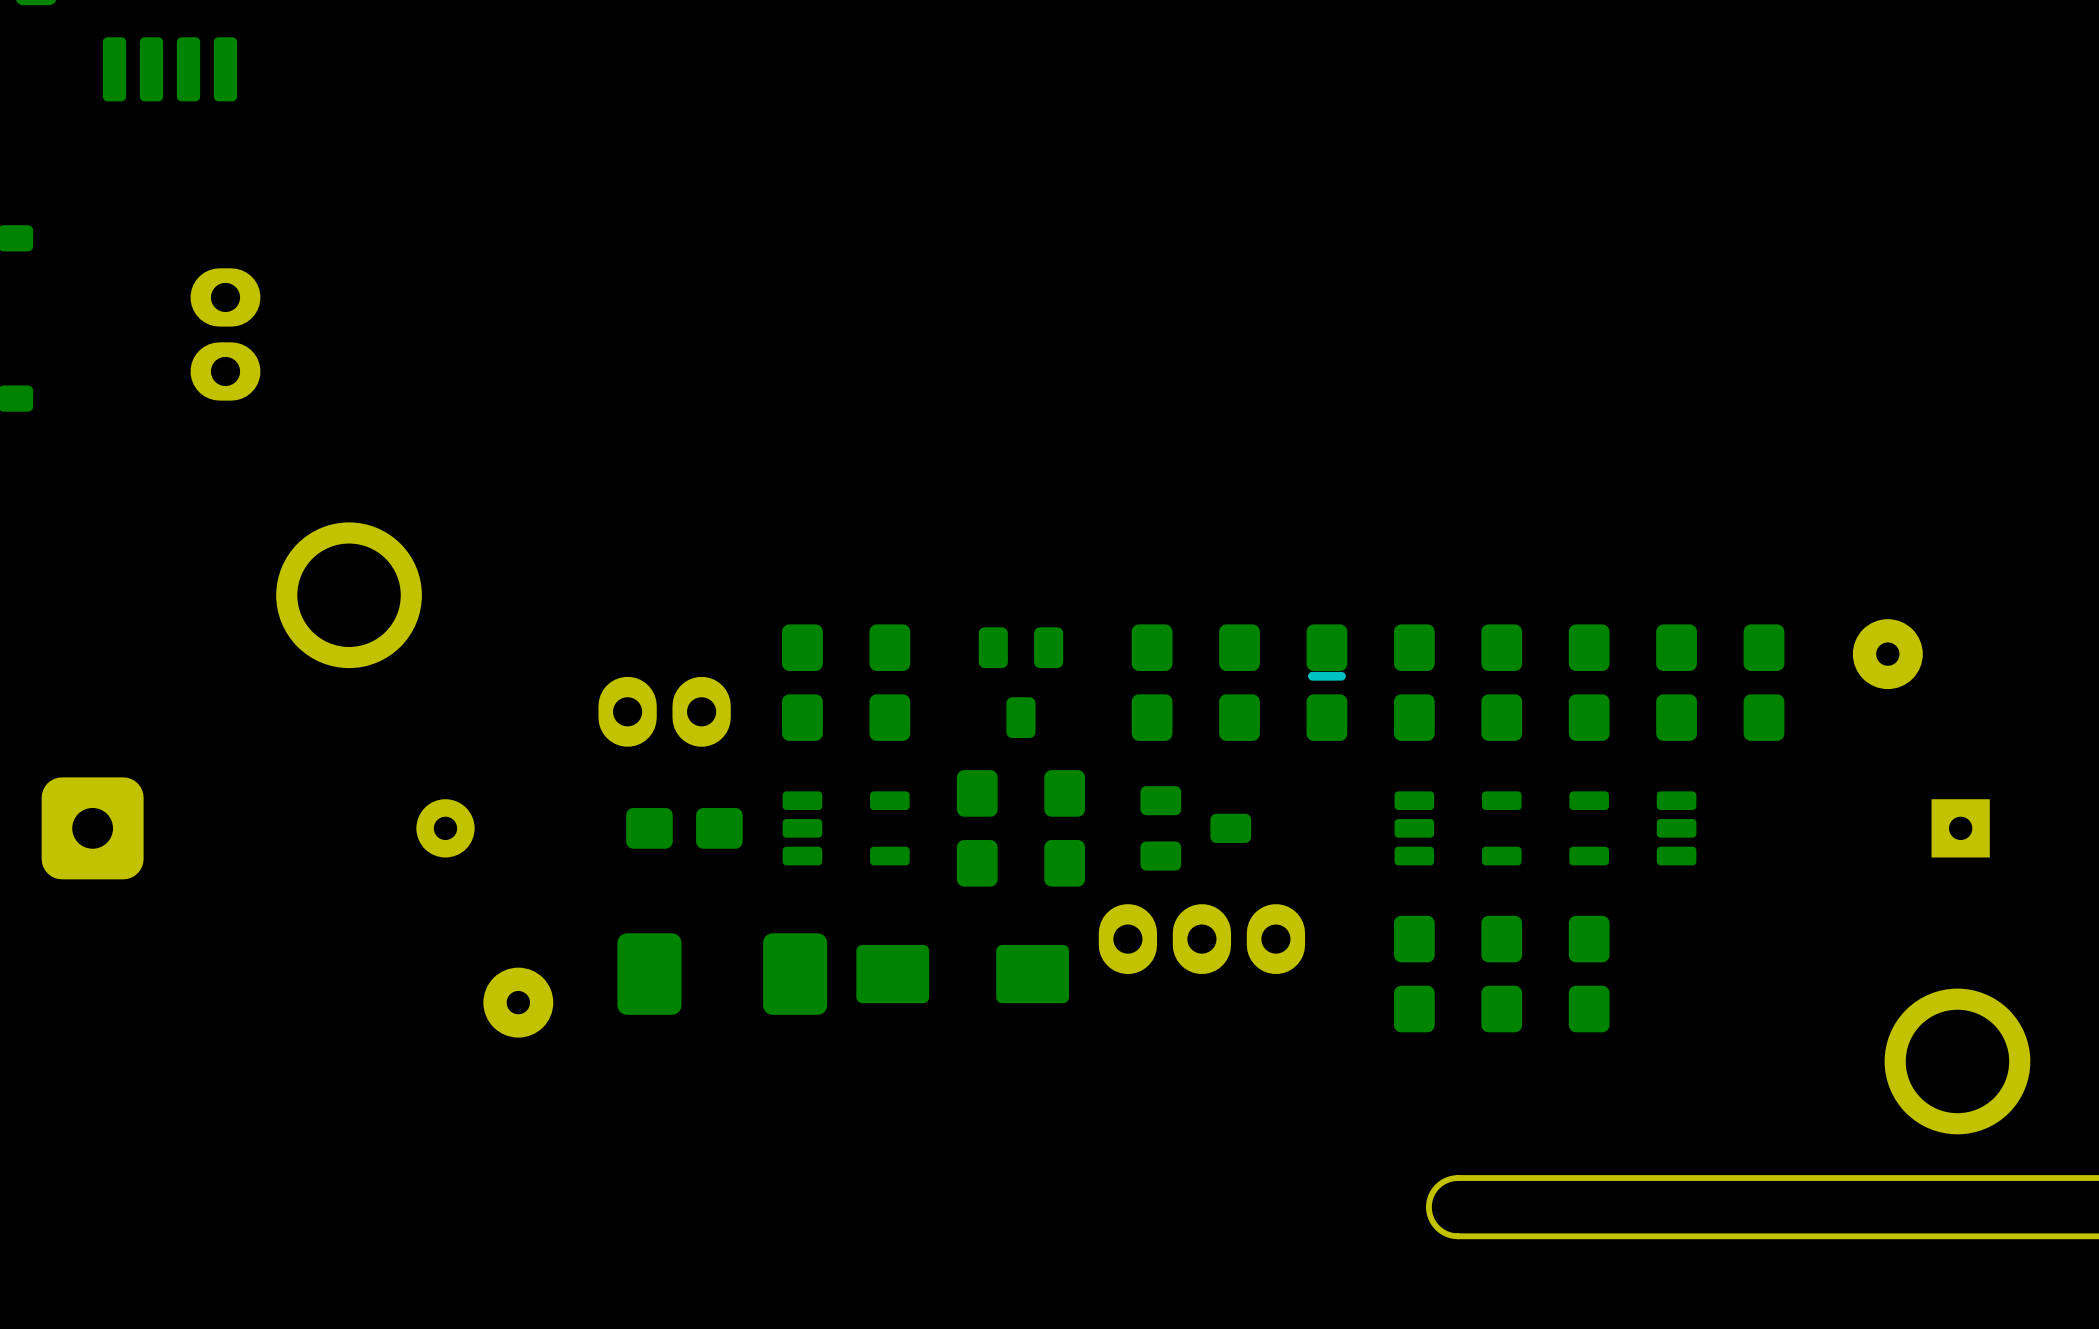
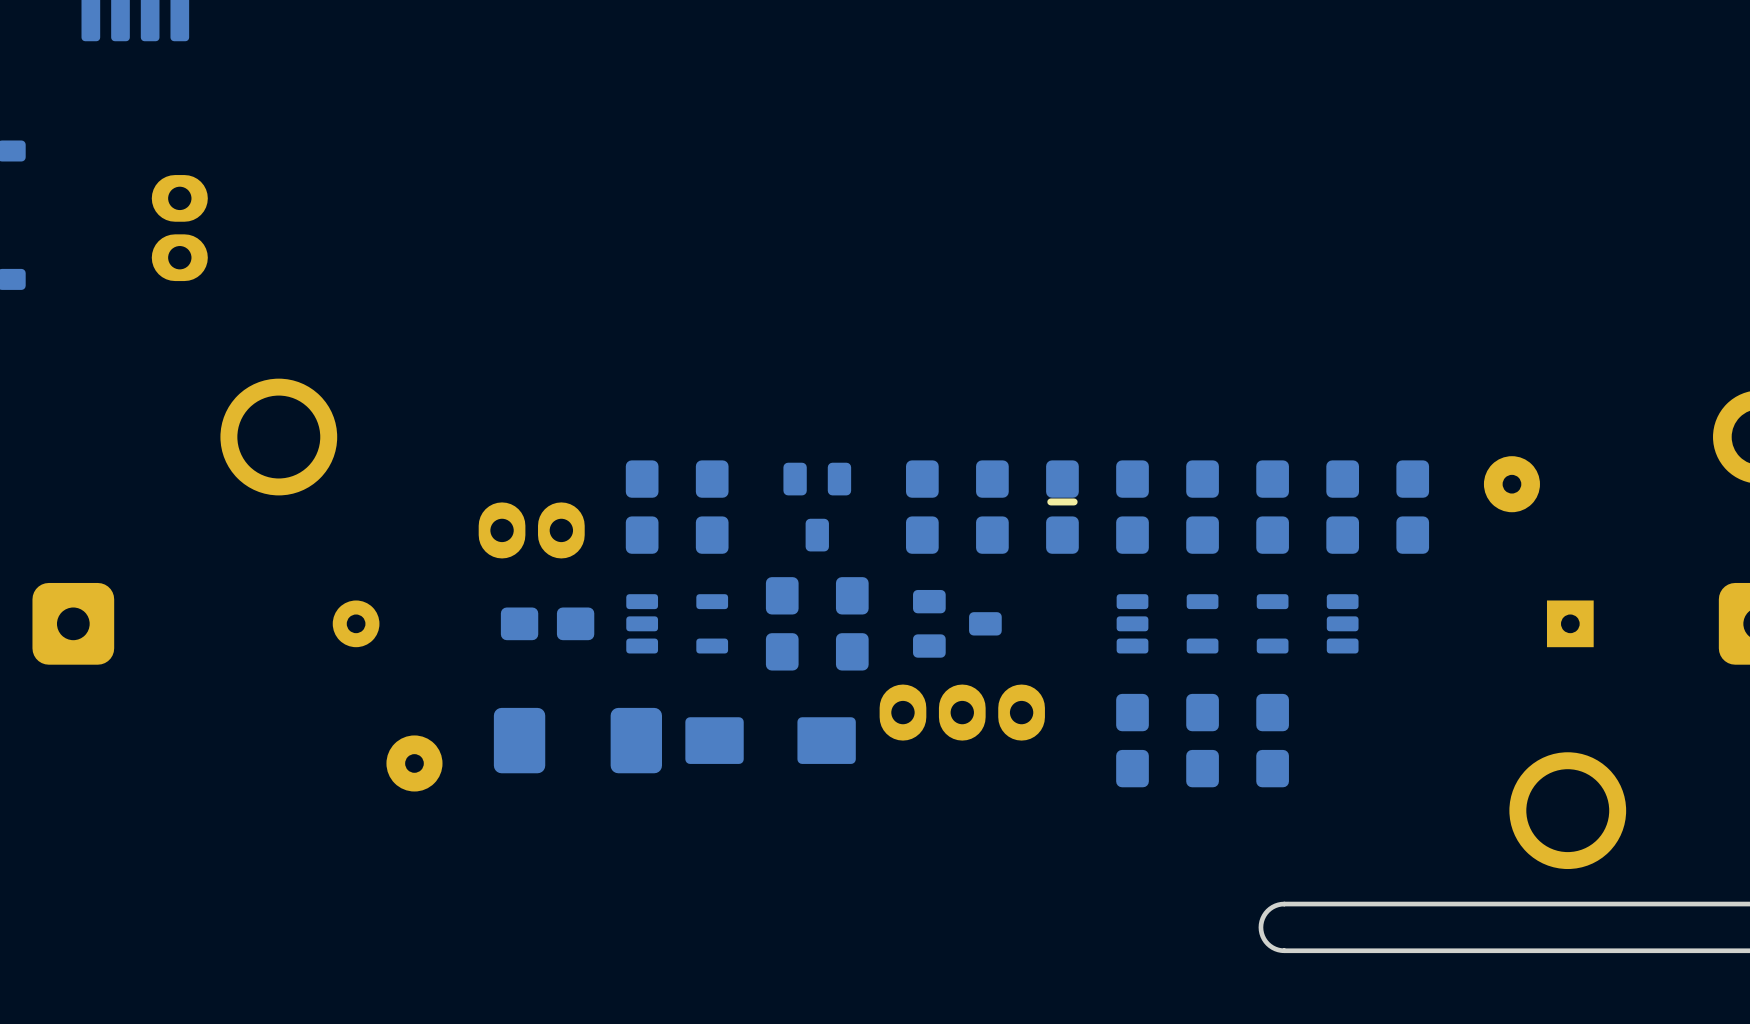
board edge: (1603, 1178) (1454, 1178) (1437, 1186) (1431, 1196) (1428, 1207) (1431, 1218) (1437, 1227) (1454, 1236) (1603, 1236) -> (1284, 904) (1275, 905) (1267, 910) (1262, 918) (1260, 927) (1262, 936) (1267, 943) (1275, 948) (1284, 950)

